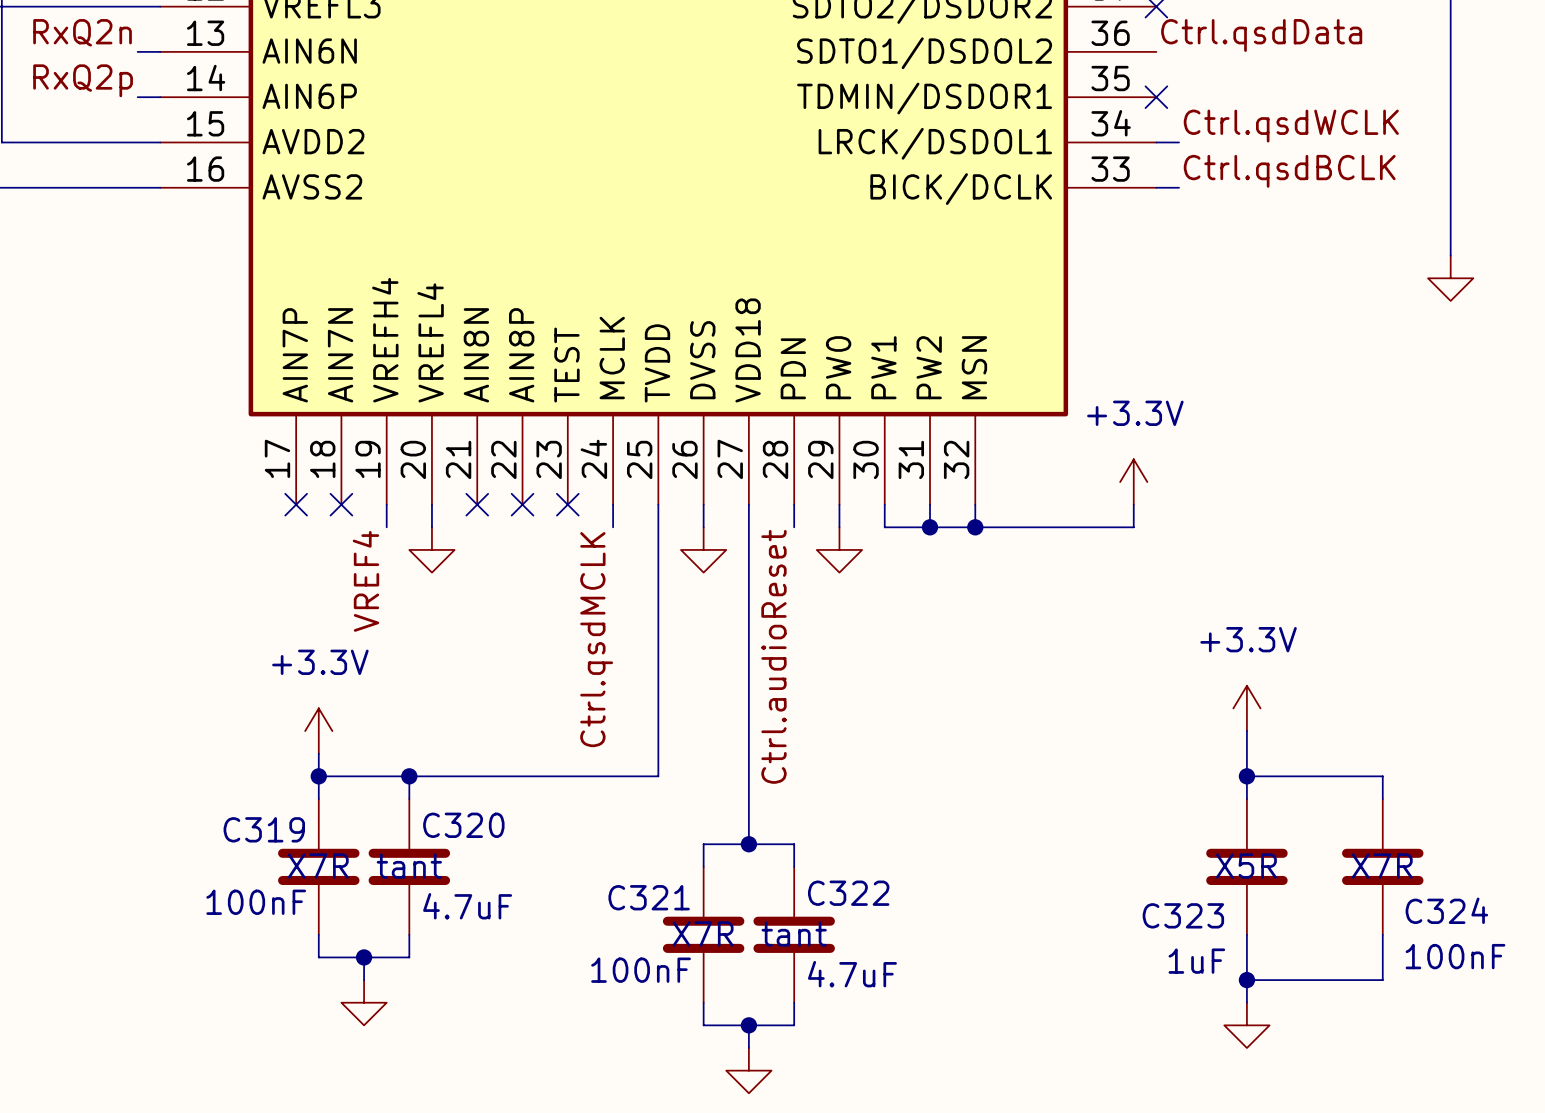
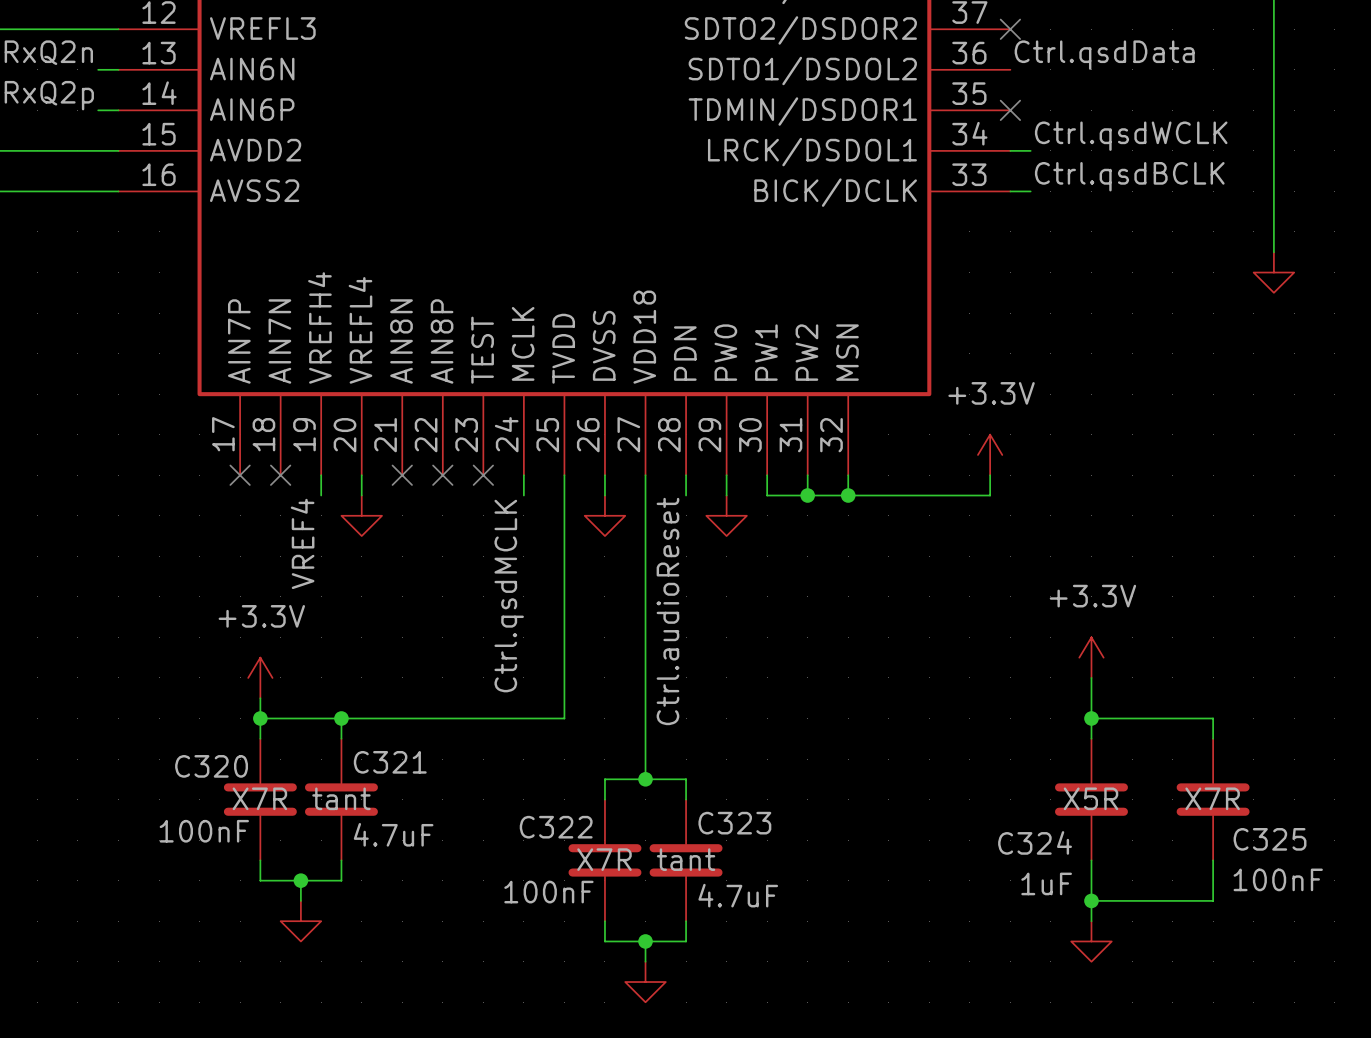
C320 name: C320 (463, 825) -> C321 (390, 762)
C319 name: C319 (264, 829) -> C320 (211, 766)
C322 name: C322 (848, 893) -> C323 (734, 823)
C321 name: C321 (649, 897) -> C322 (556, 827)
C324 name: C324 (1446, 910) -> C325 (1270, 839)
C323 name: C323 (1183, 915) -> C324 (1035, 842)

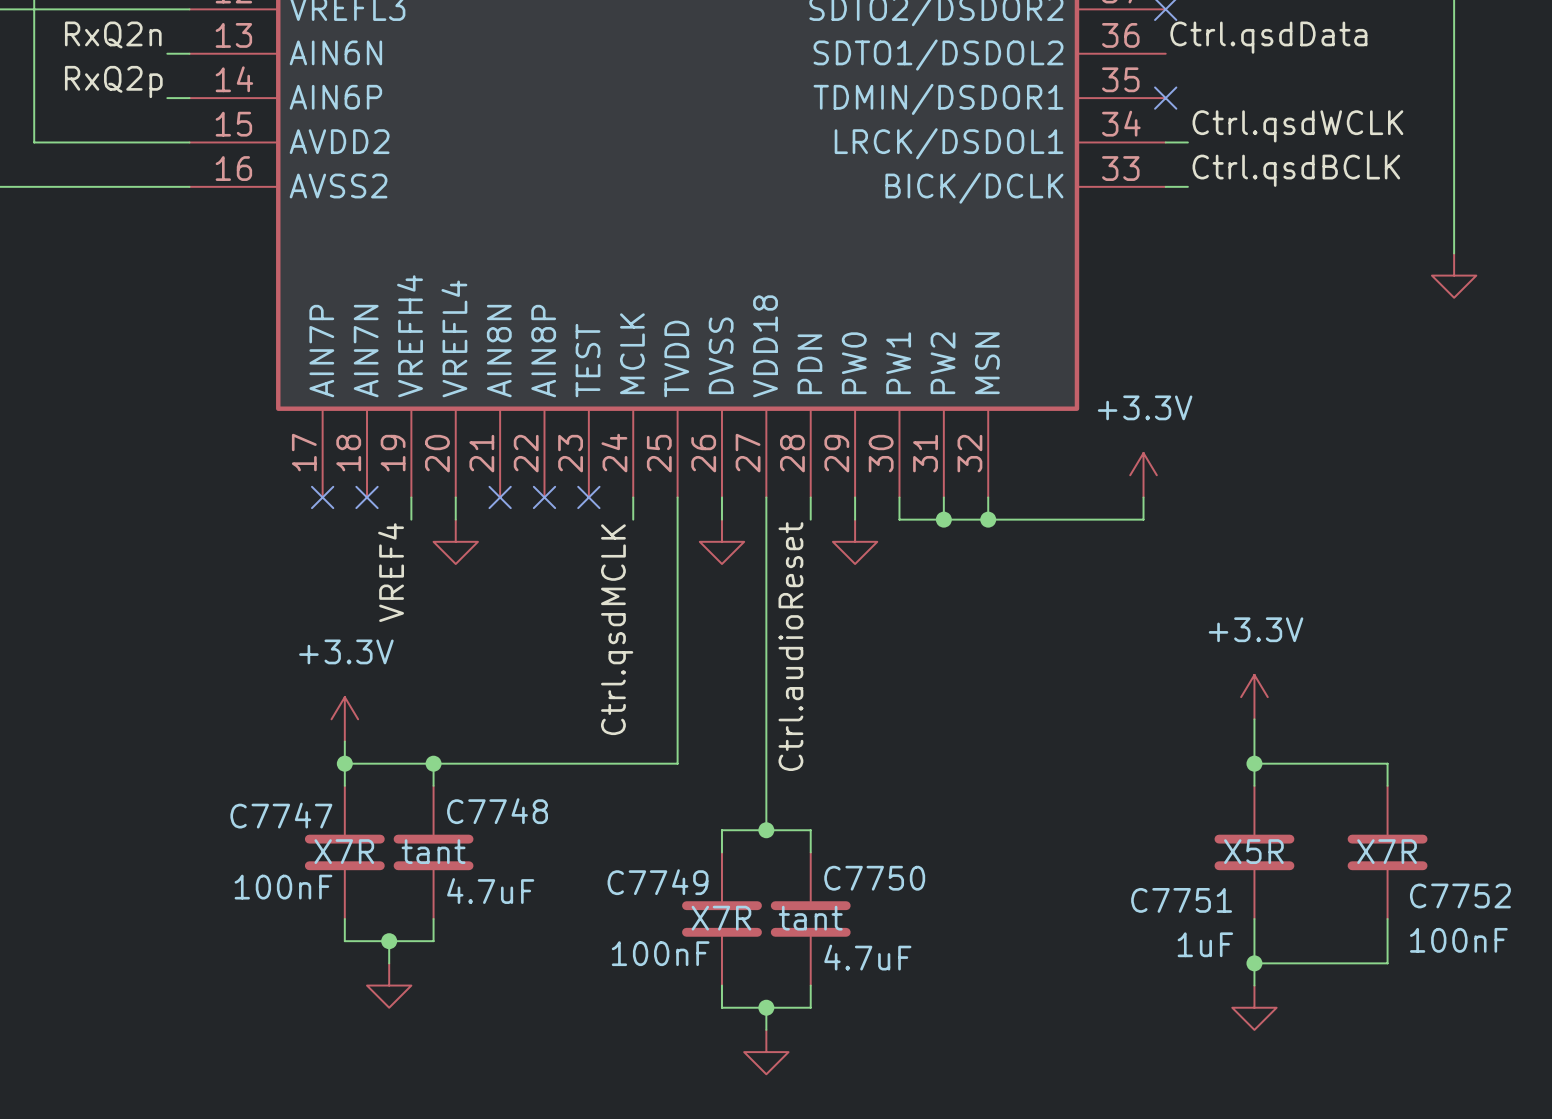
C321 name: C321 (390, 762) -> C7748 (497, 811)
C320 name: C320 (211, 766) -> C7747 (281, 815)
C323 name: C323 (734, 823) -> C7750 (874, 878)
C322 name: C322 (556, 827) -> C7749 (658, 882)
C325 name: C325 (1270, 839) -> C7752 (1460, 895)
C324 name: C324 (1035, 842) -> C7751 (1181, 900)

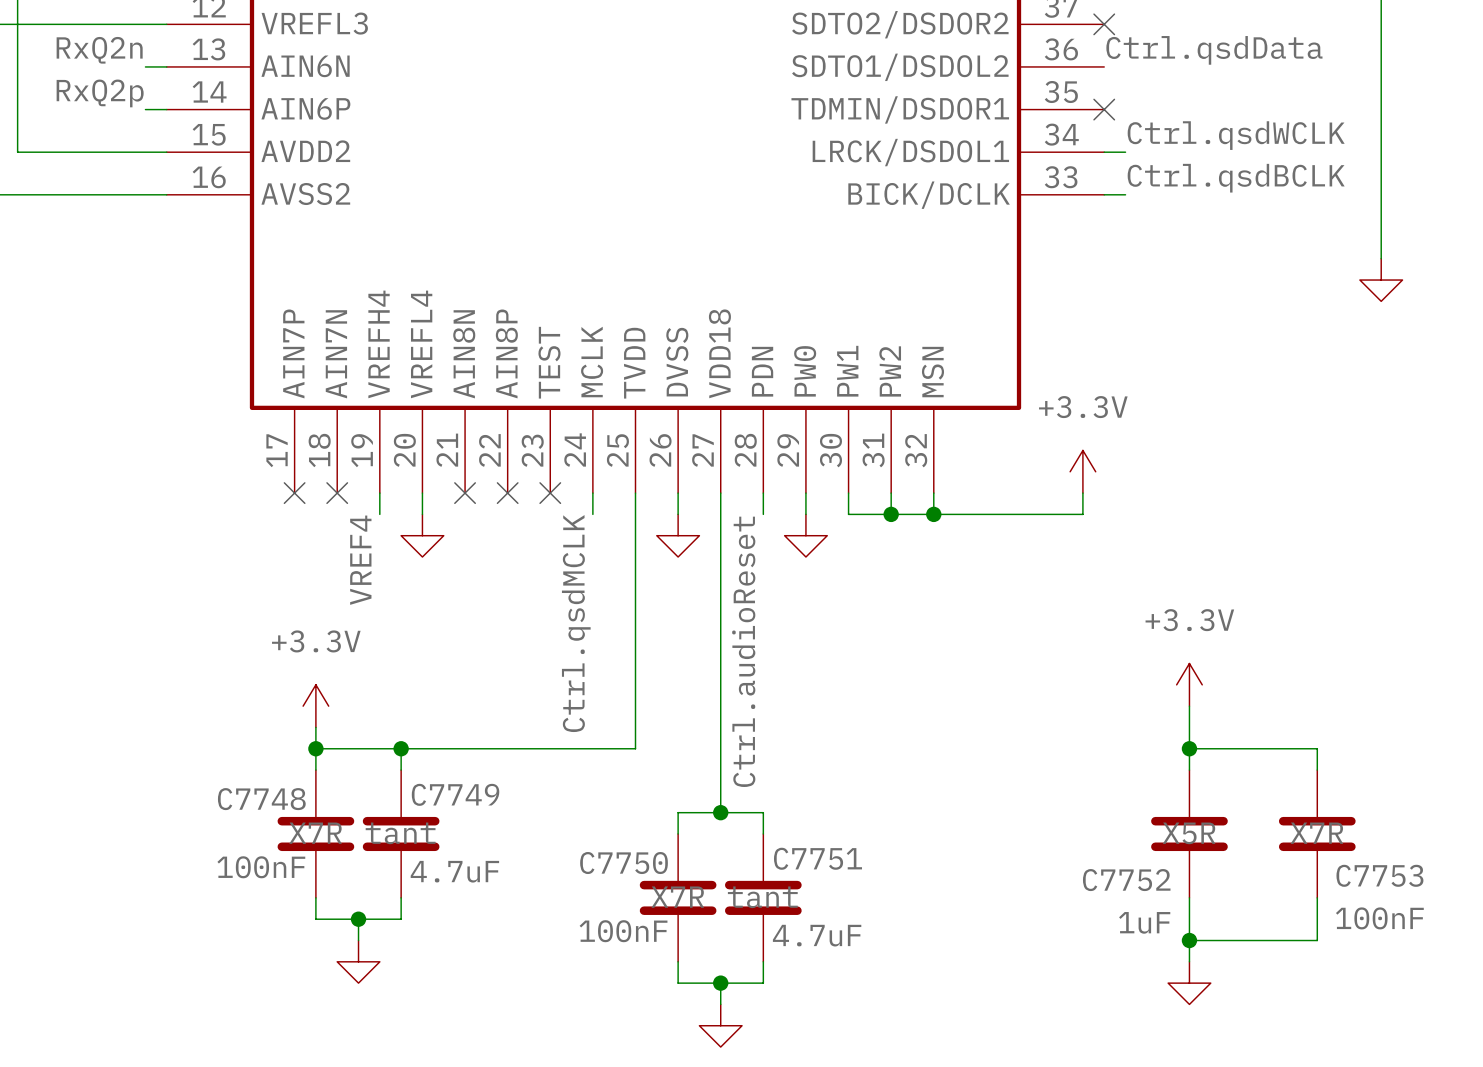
C7748 name: C7748 (497, 811) -> C7749 (455, 794)
C7747 name: C7747 (281, 815) -> C7748 (261, 799)
C7750 name: C7750 (874, 878) -> C7751 (817, 858)
C7749 name: C7749 (658, 882) -> C7750 (624, 863)
C7752 name: C7752 (1460, 895) -> C7753 (1379, 875)
C7751 name: C7751 (1181, 900) -> C7752 (1126, 880)

